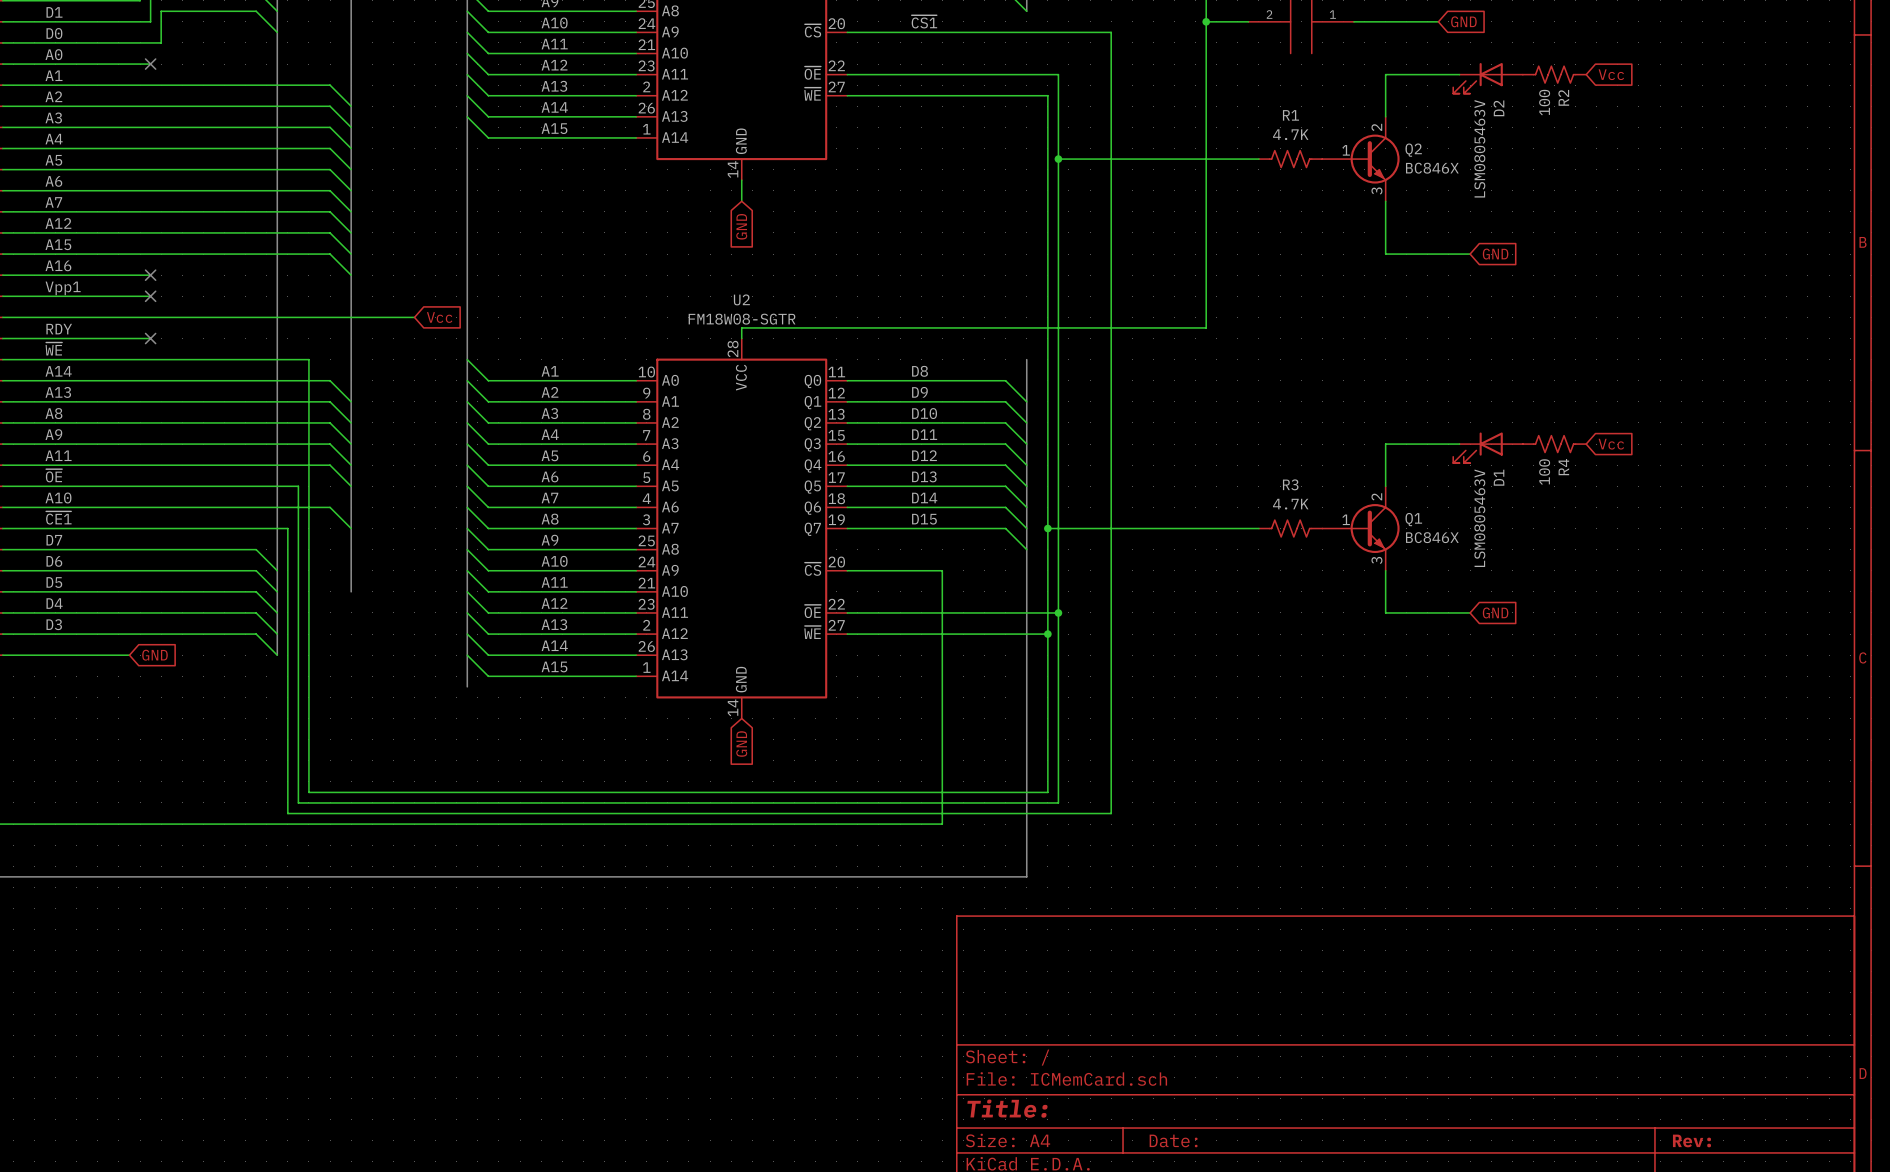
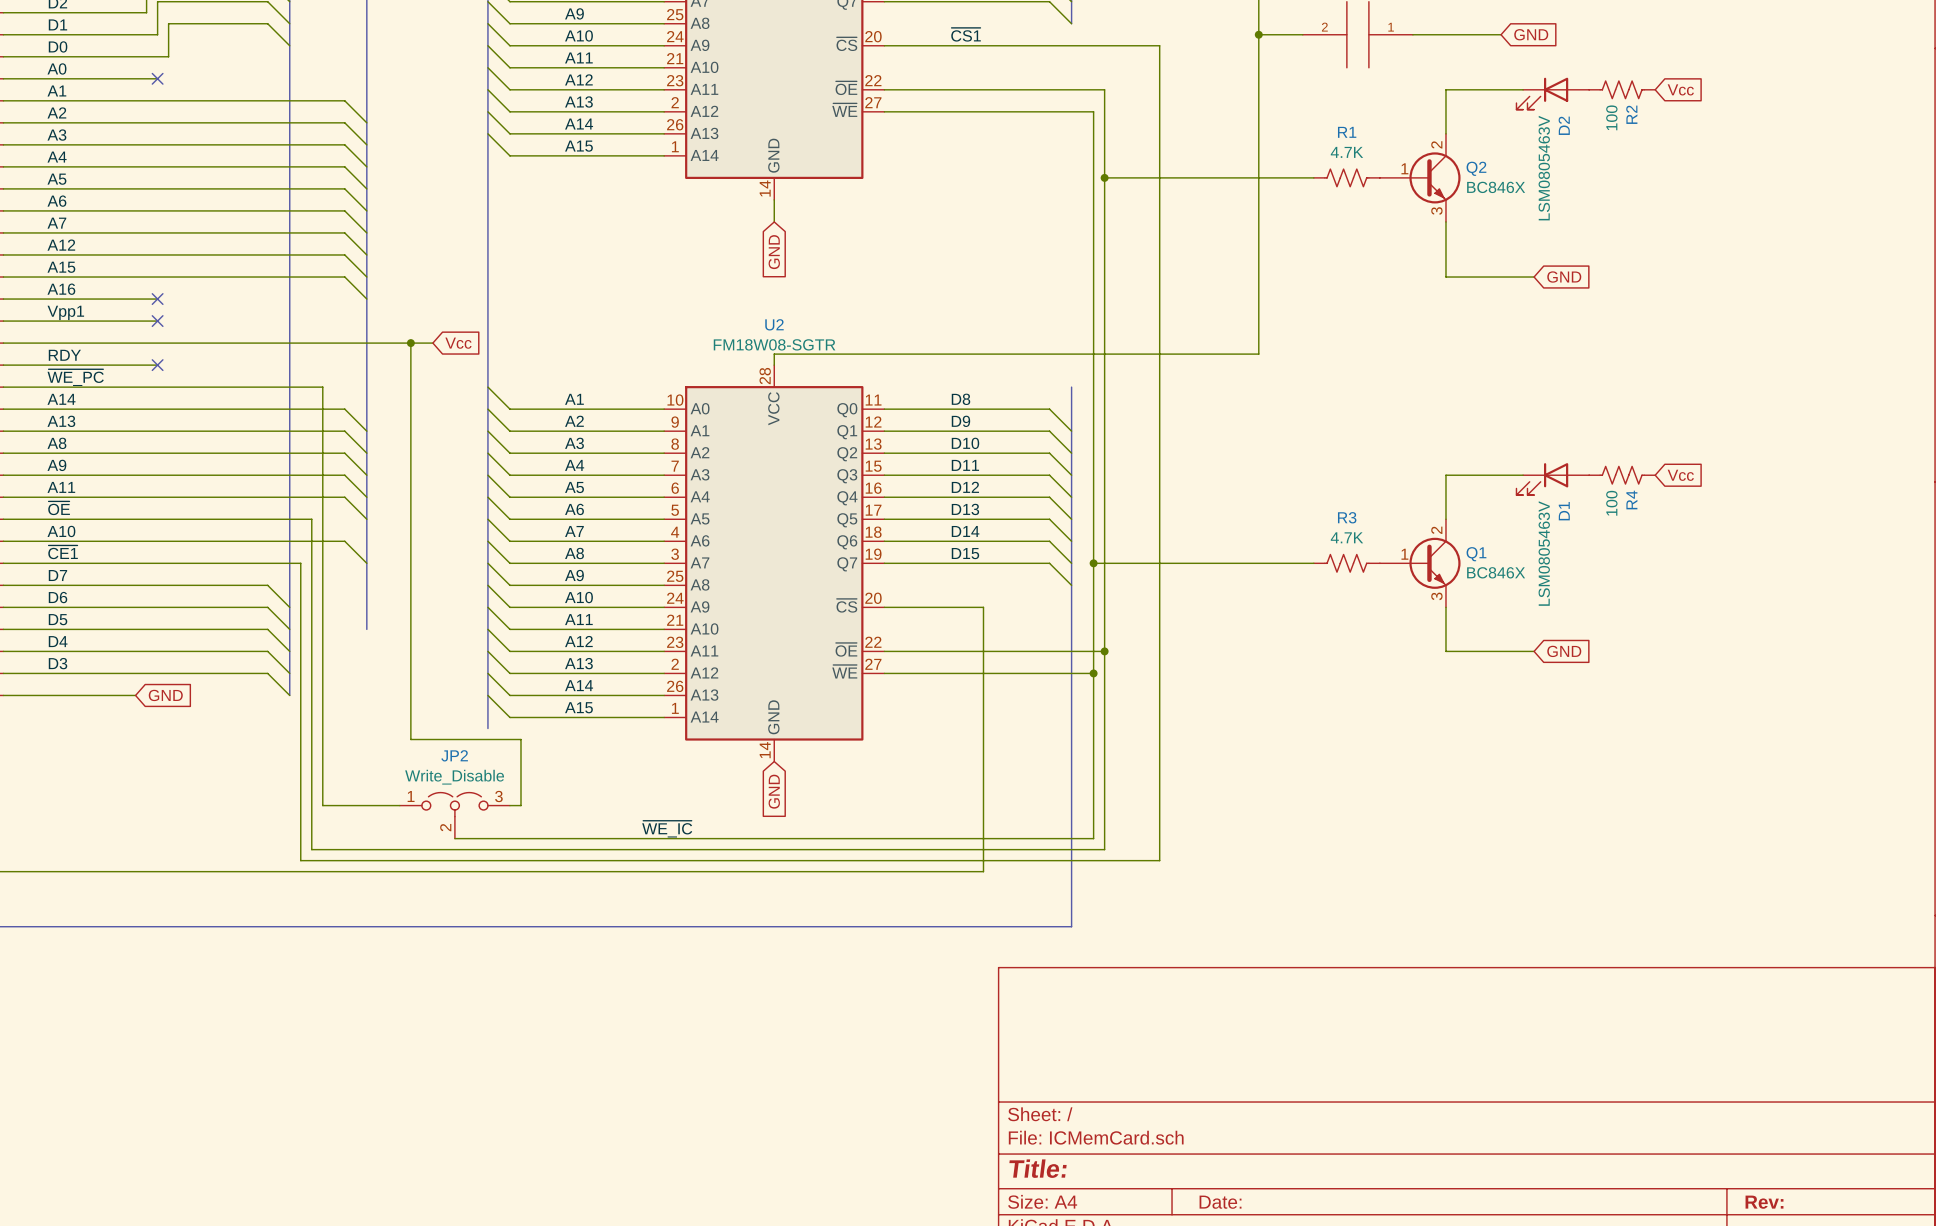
wire: none -> (410, 343) (410, 739) (520, 739) (520, 805) (509, 805)
junction: none -> (410, 343)
label: ~{WE} (53, 349) -> ~{WE_PC} (75, 377)
wire: (308, 760) (308, 792) (435, 792) -> (322, 805) (399, 805)
JP2: none -> Write_Disable (454, 815)
label: none -> ~{WE_IC} (667, 829)

